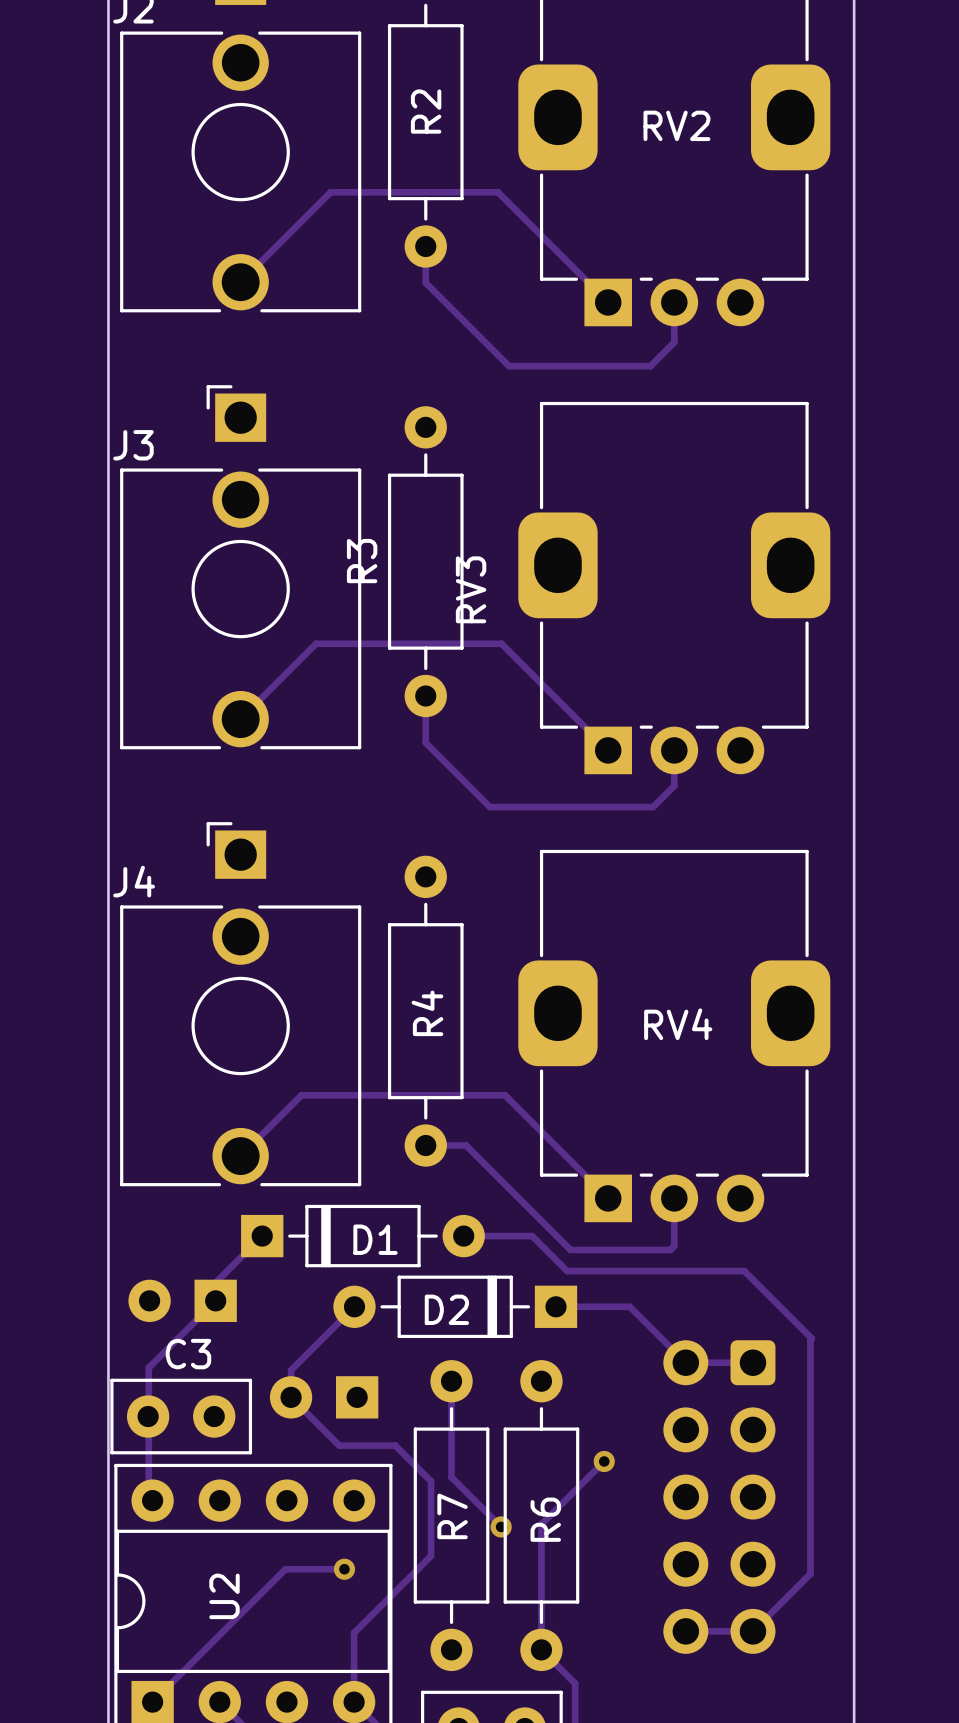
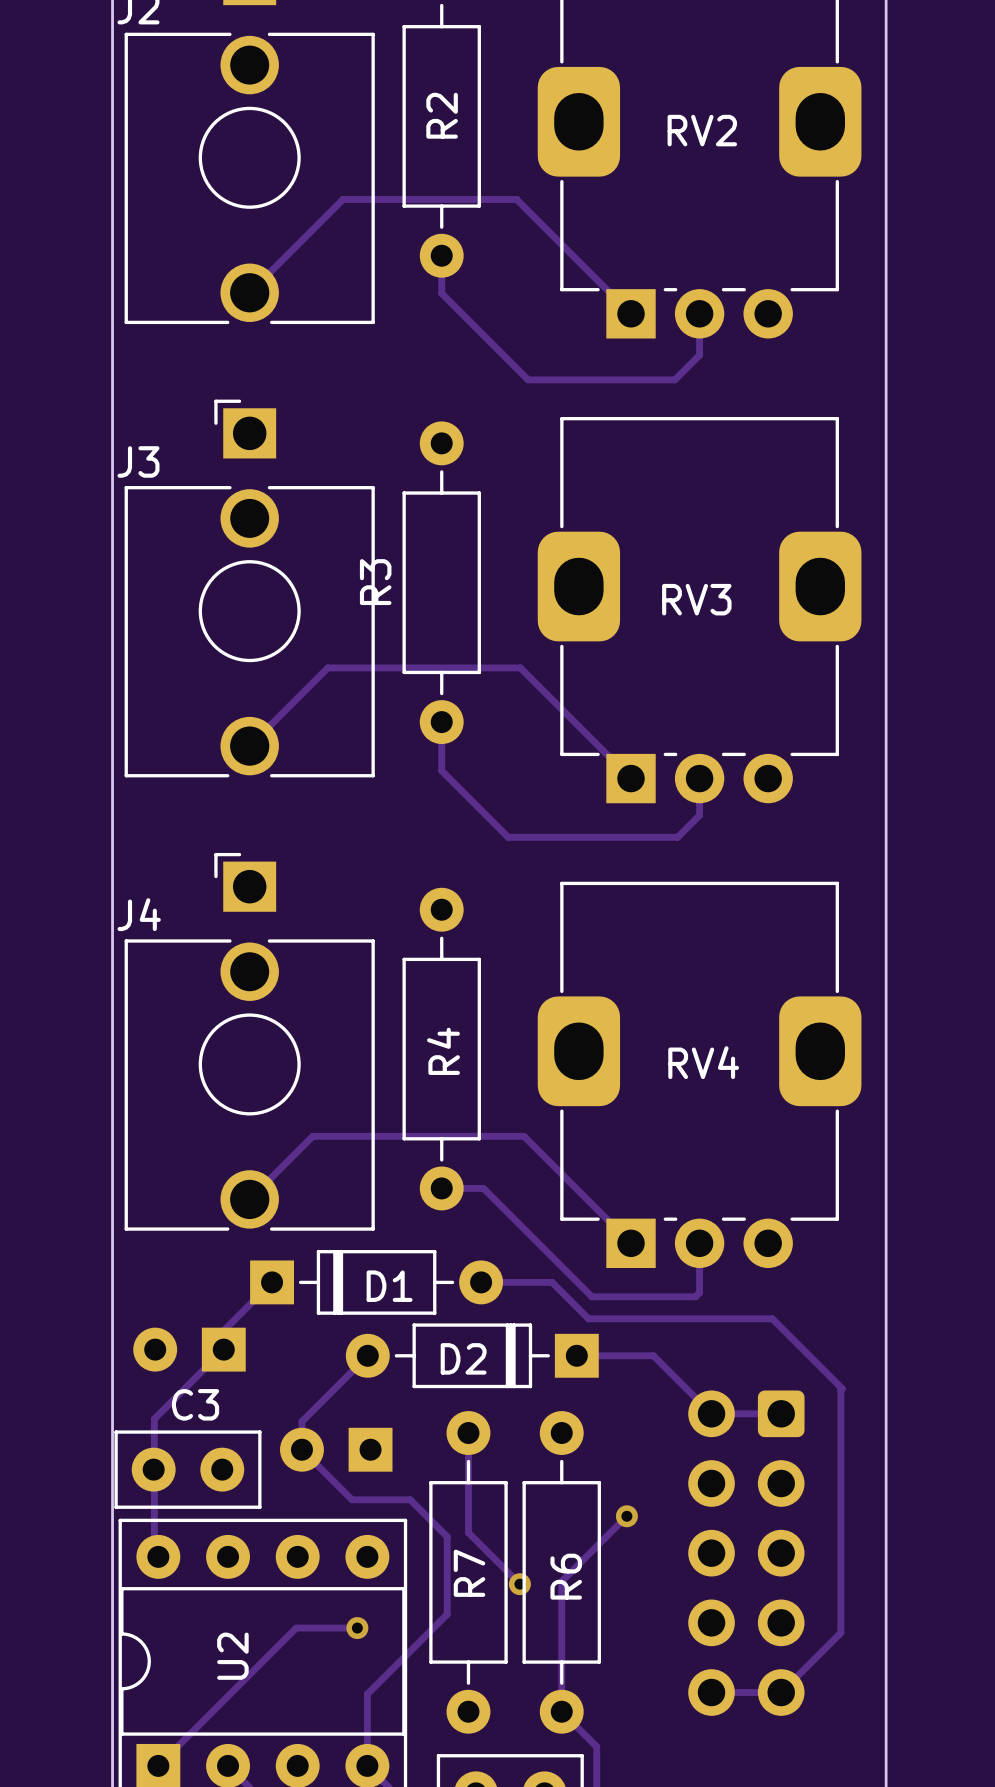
RV3 name rotation: 0° (471, 589) -> 90° clockwise (696, 599)
RV3 name position: RV3 (471, 589) -> RV3 (696, 599)

